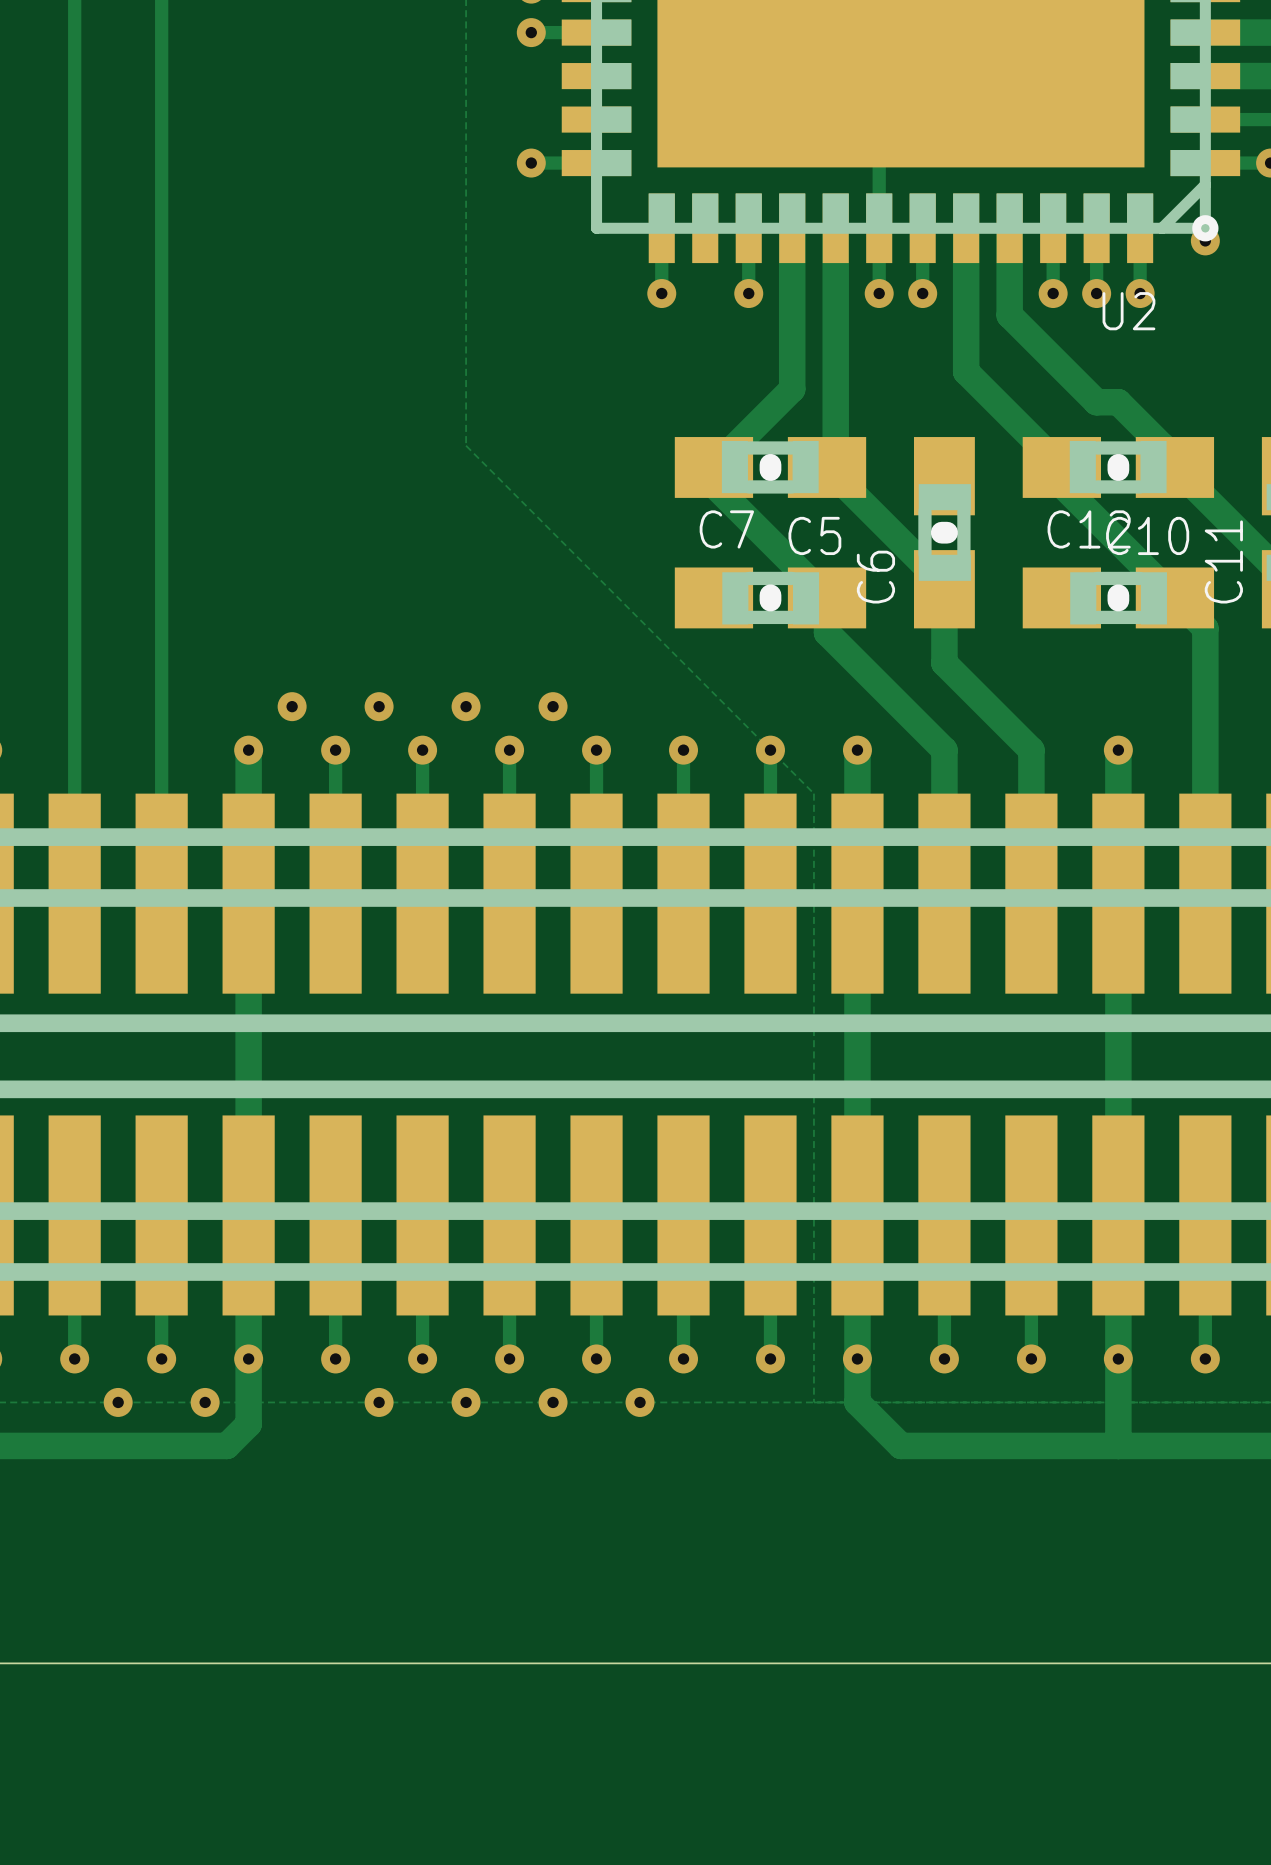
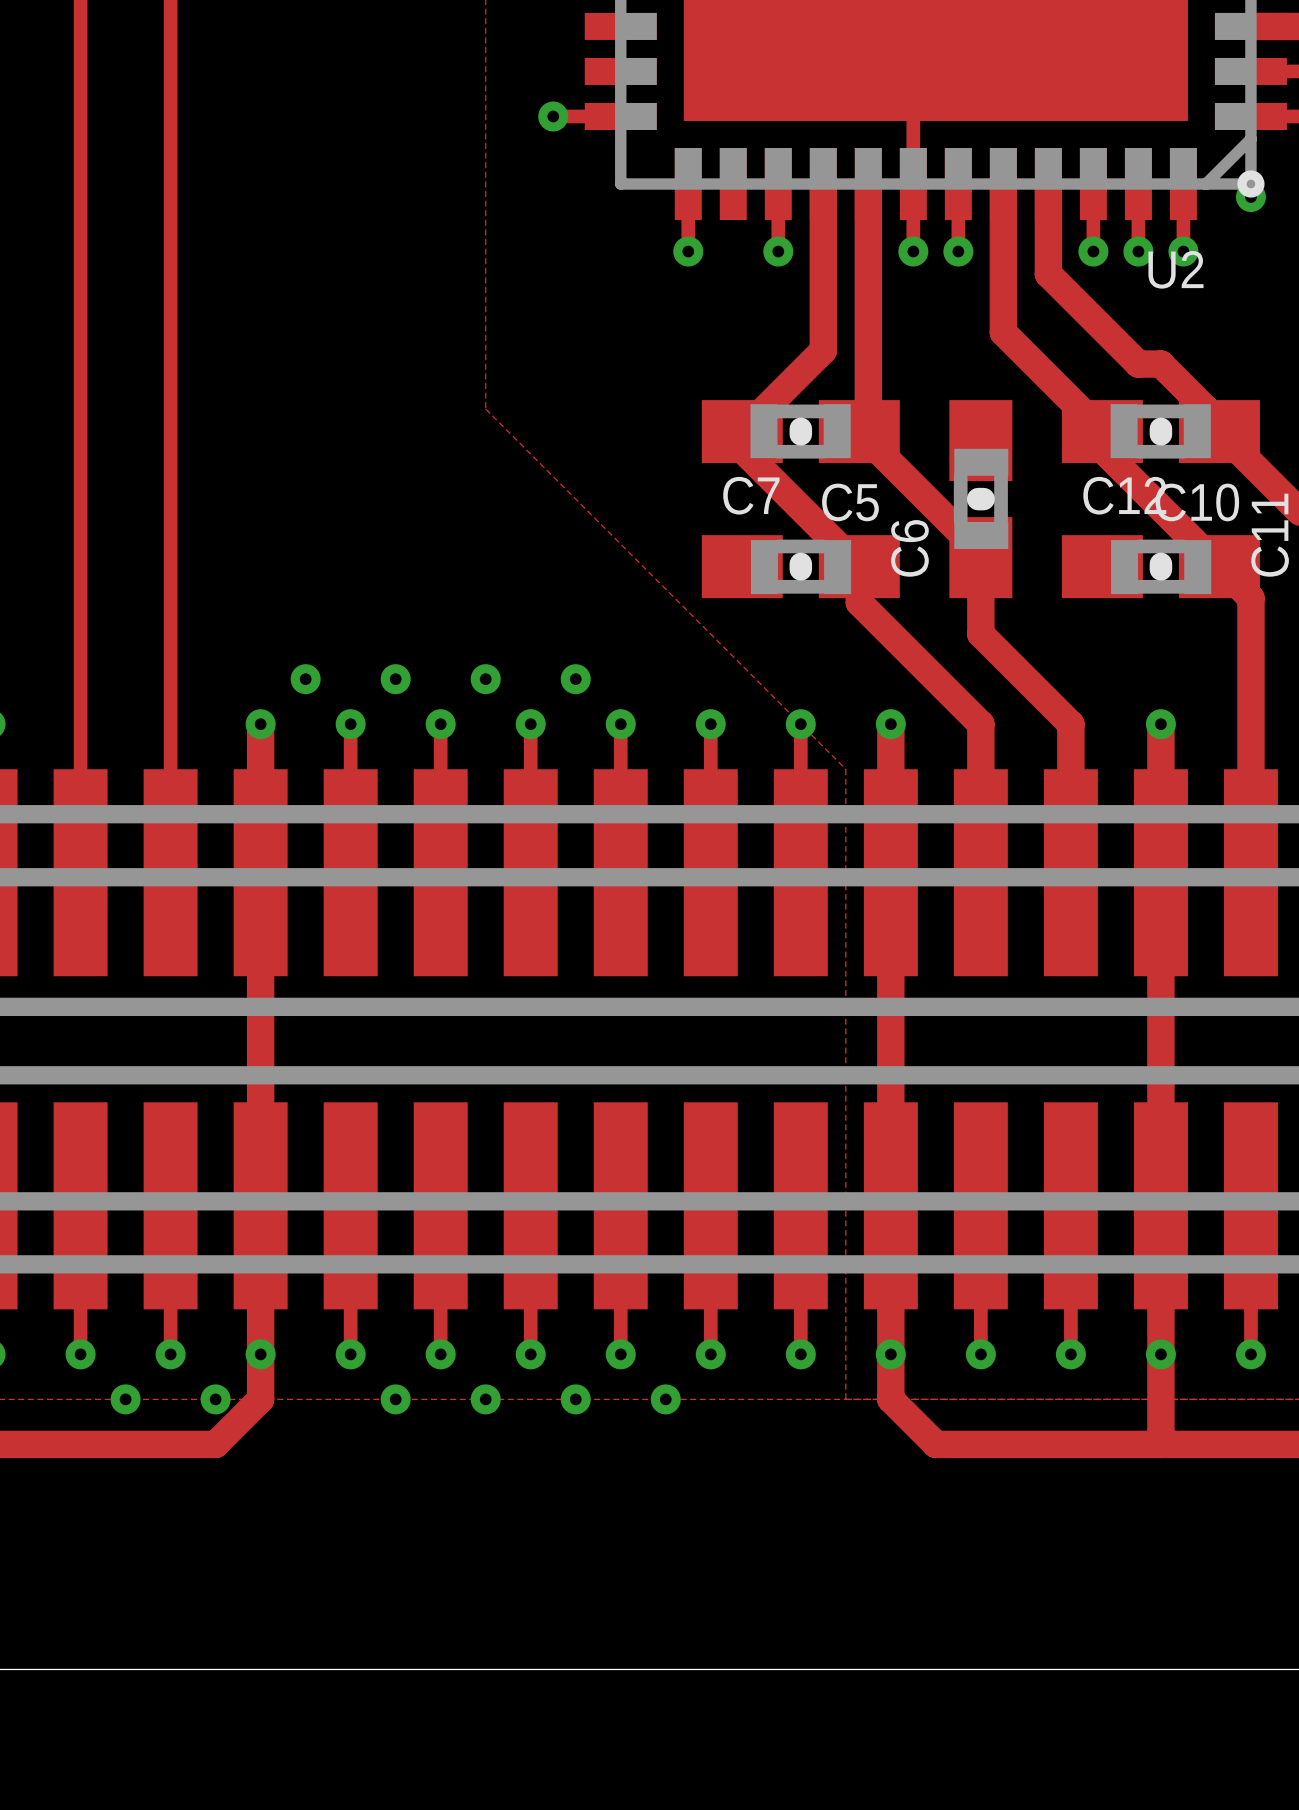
track: (248, 1402) (248, 1424) (226, 1445) (205, 1445) -> (260, 1399) (215, 1444)

